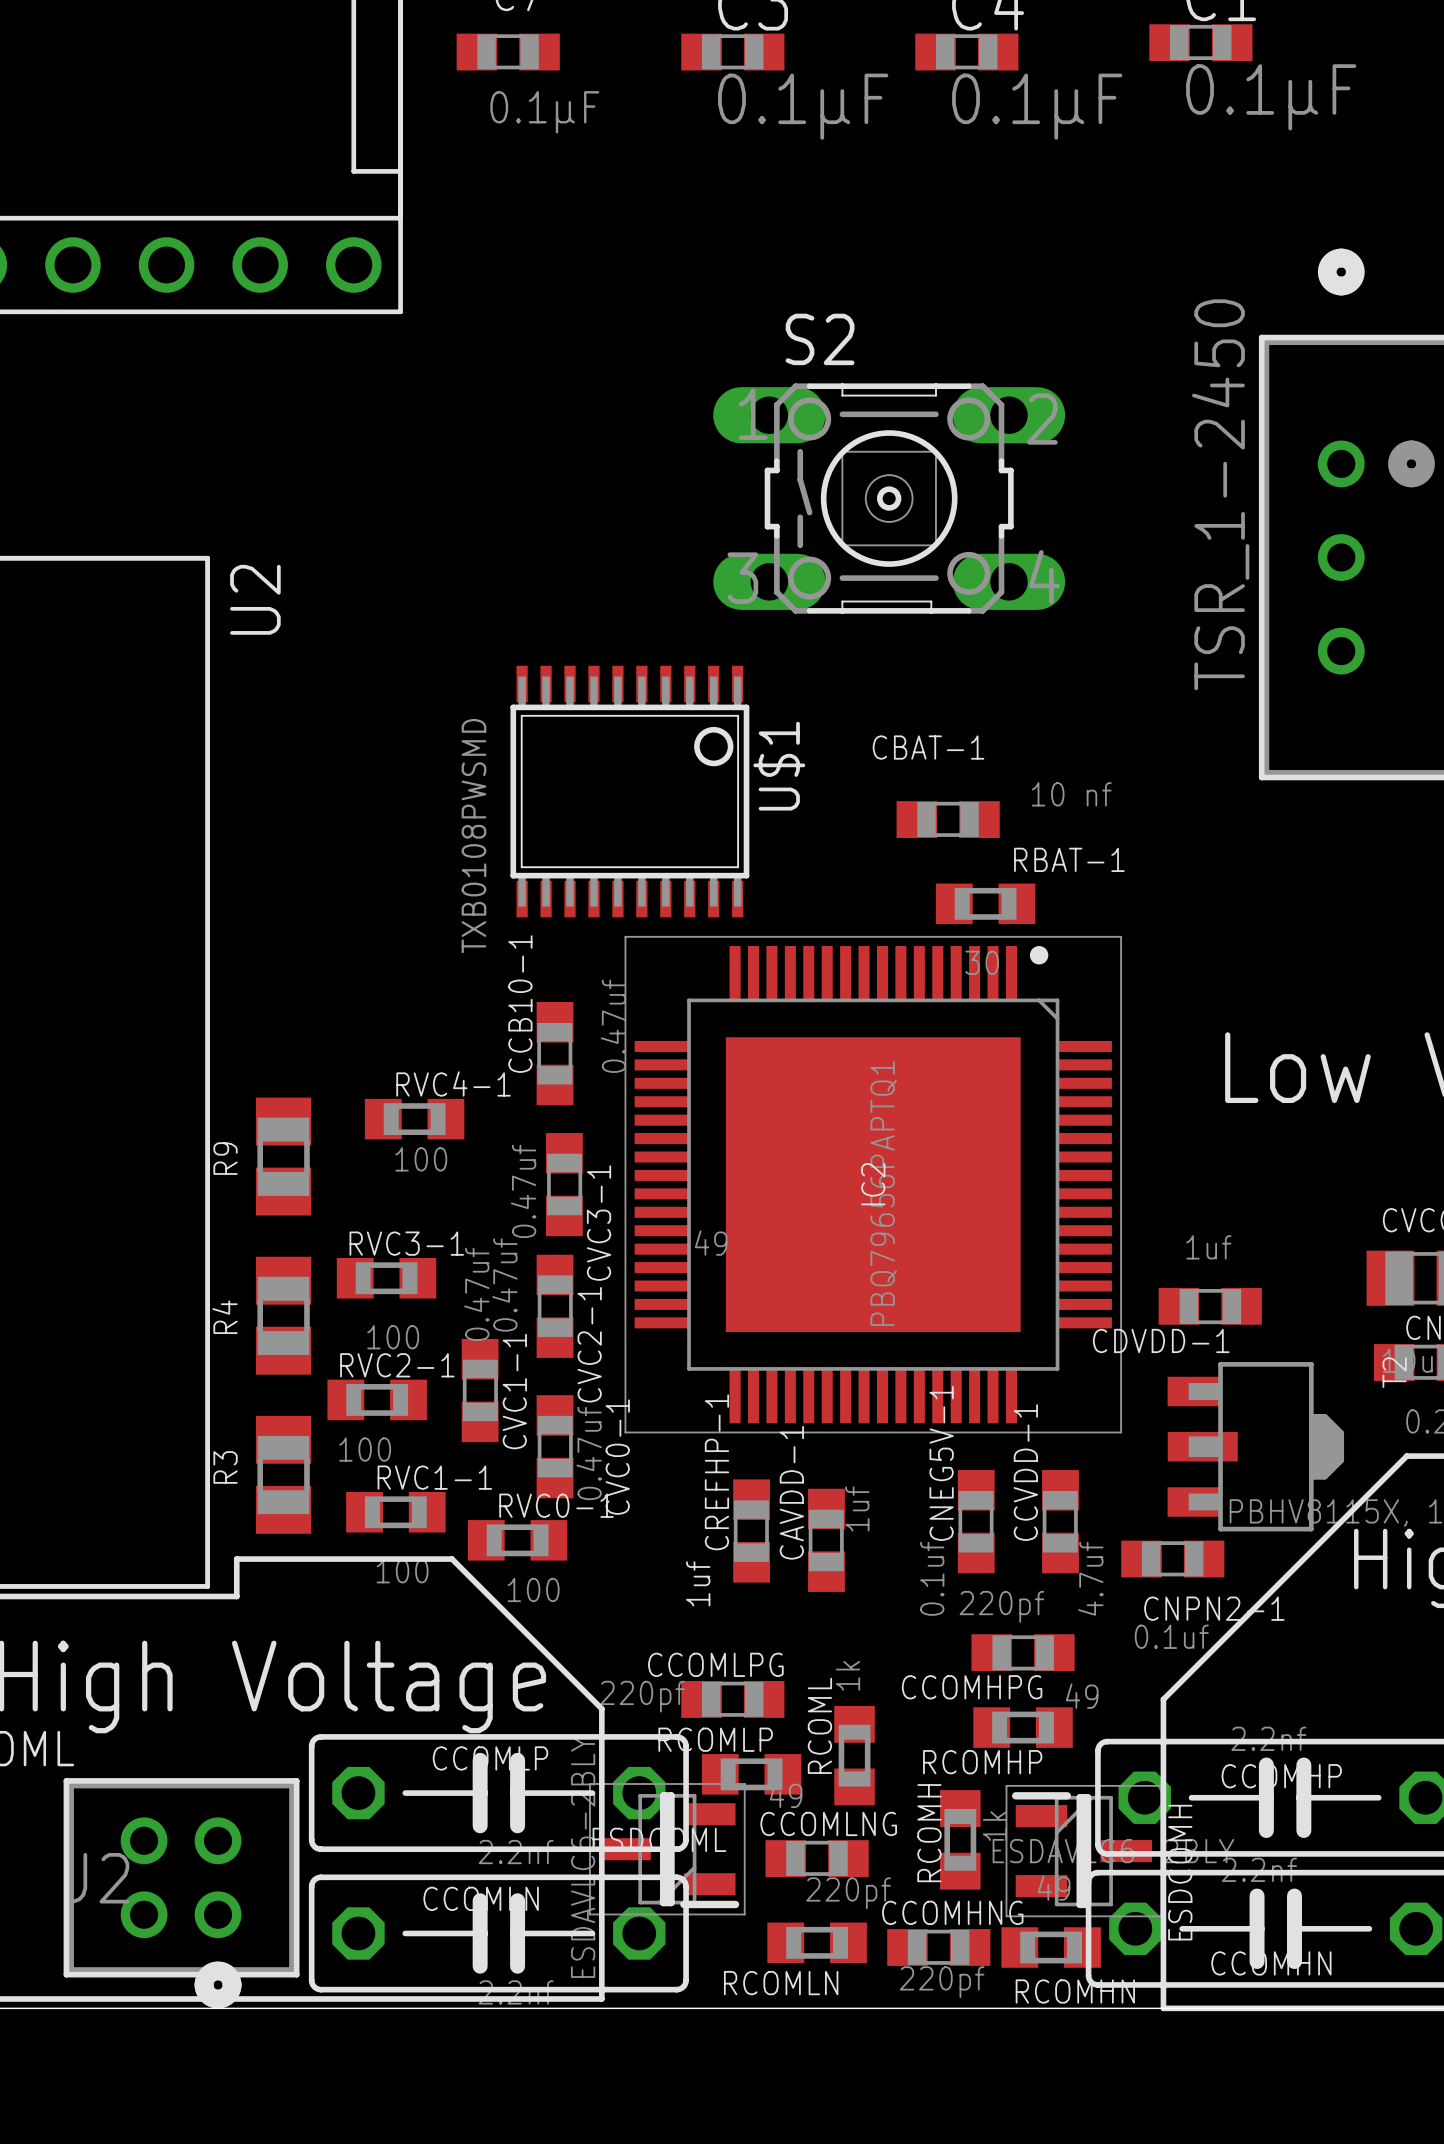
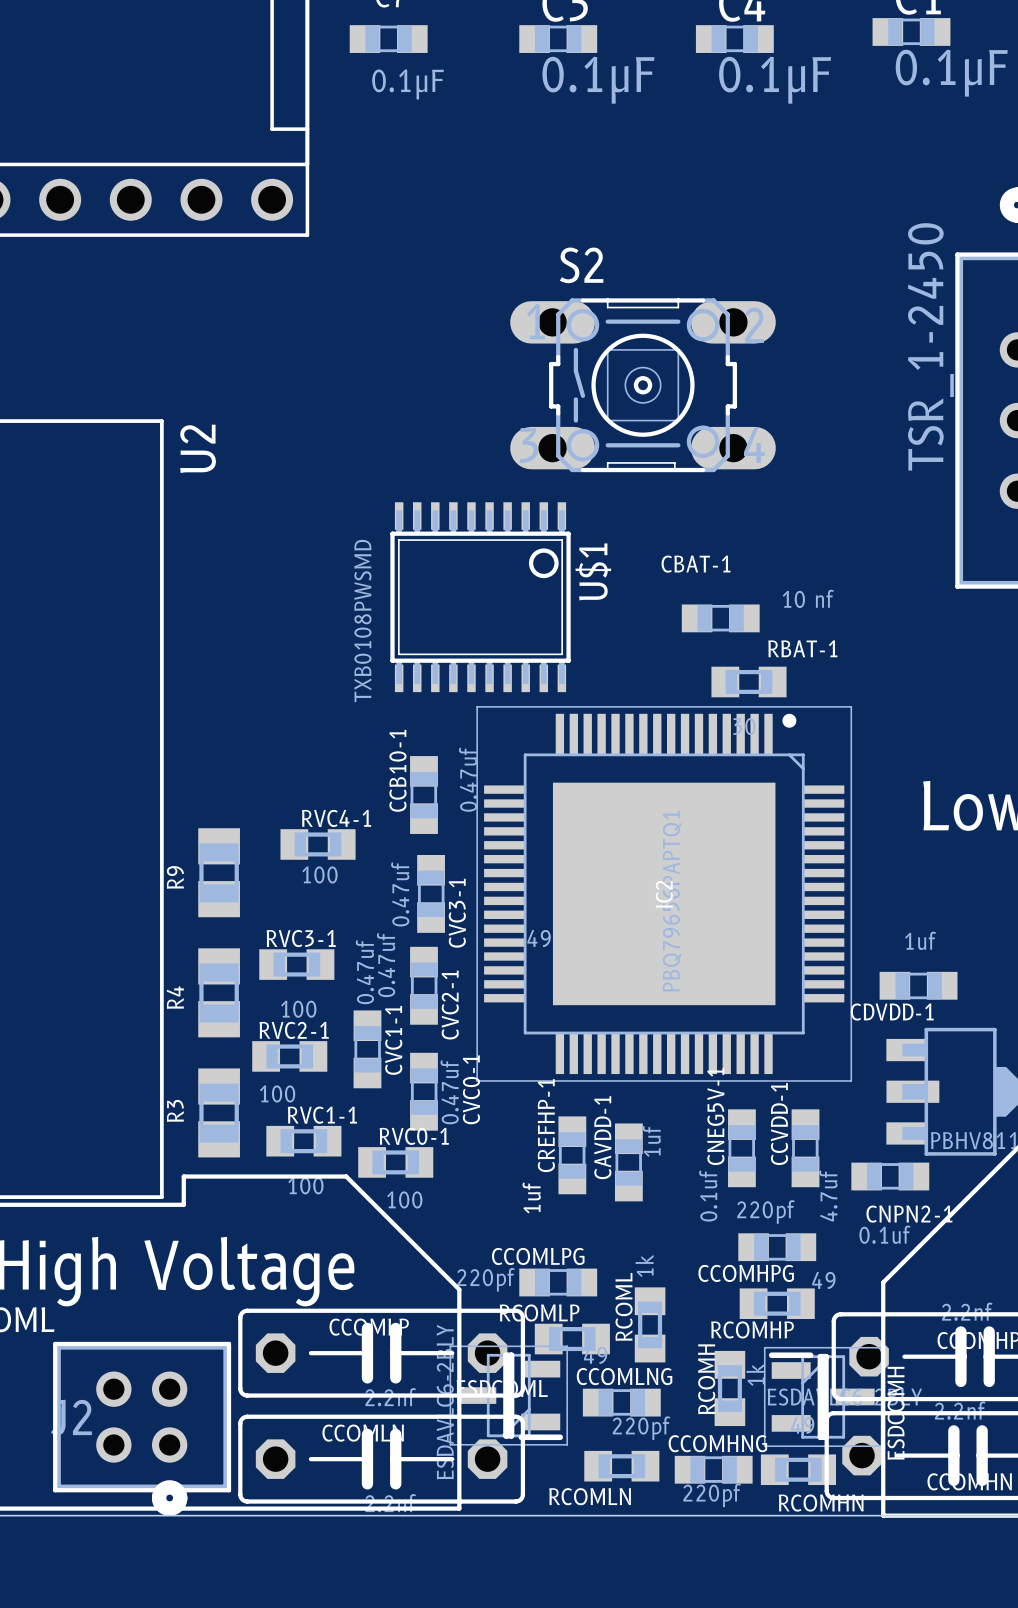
S2 position: (889, 498) -> (643, 385)

